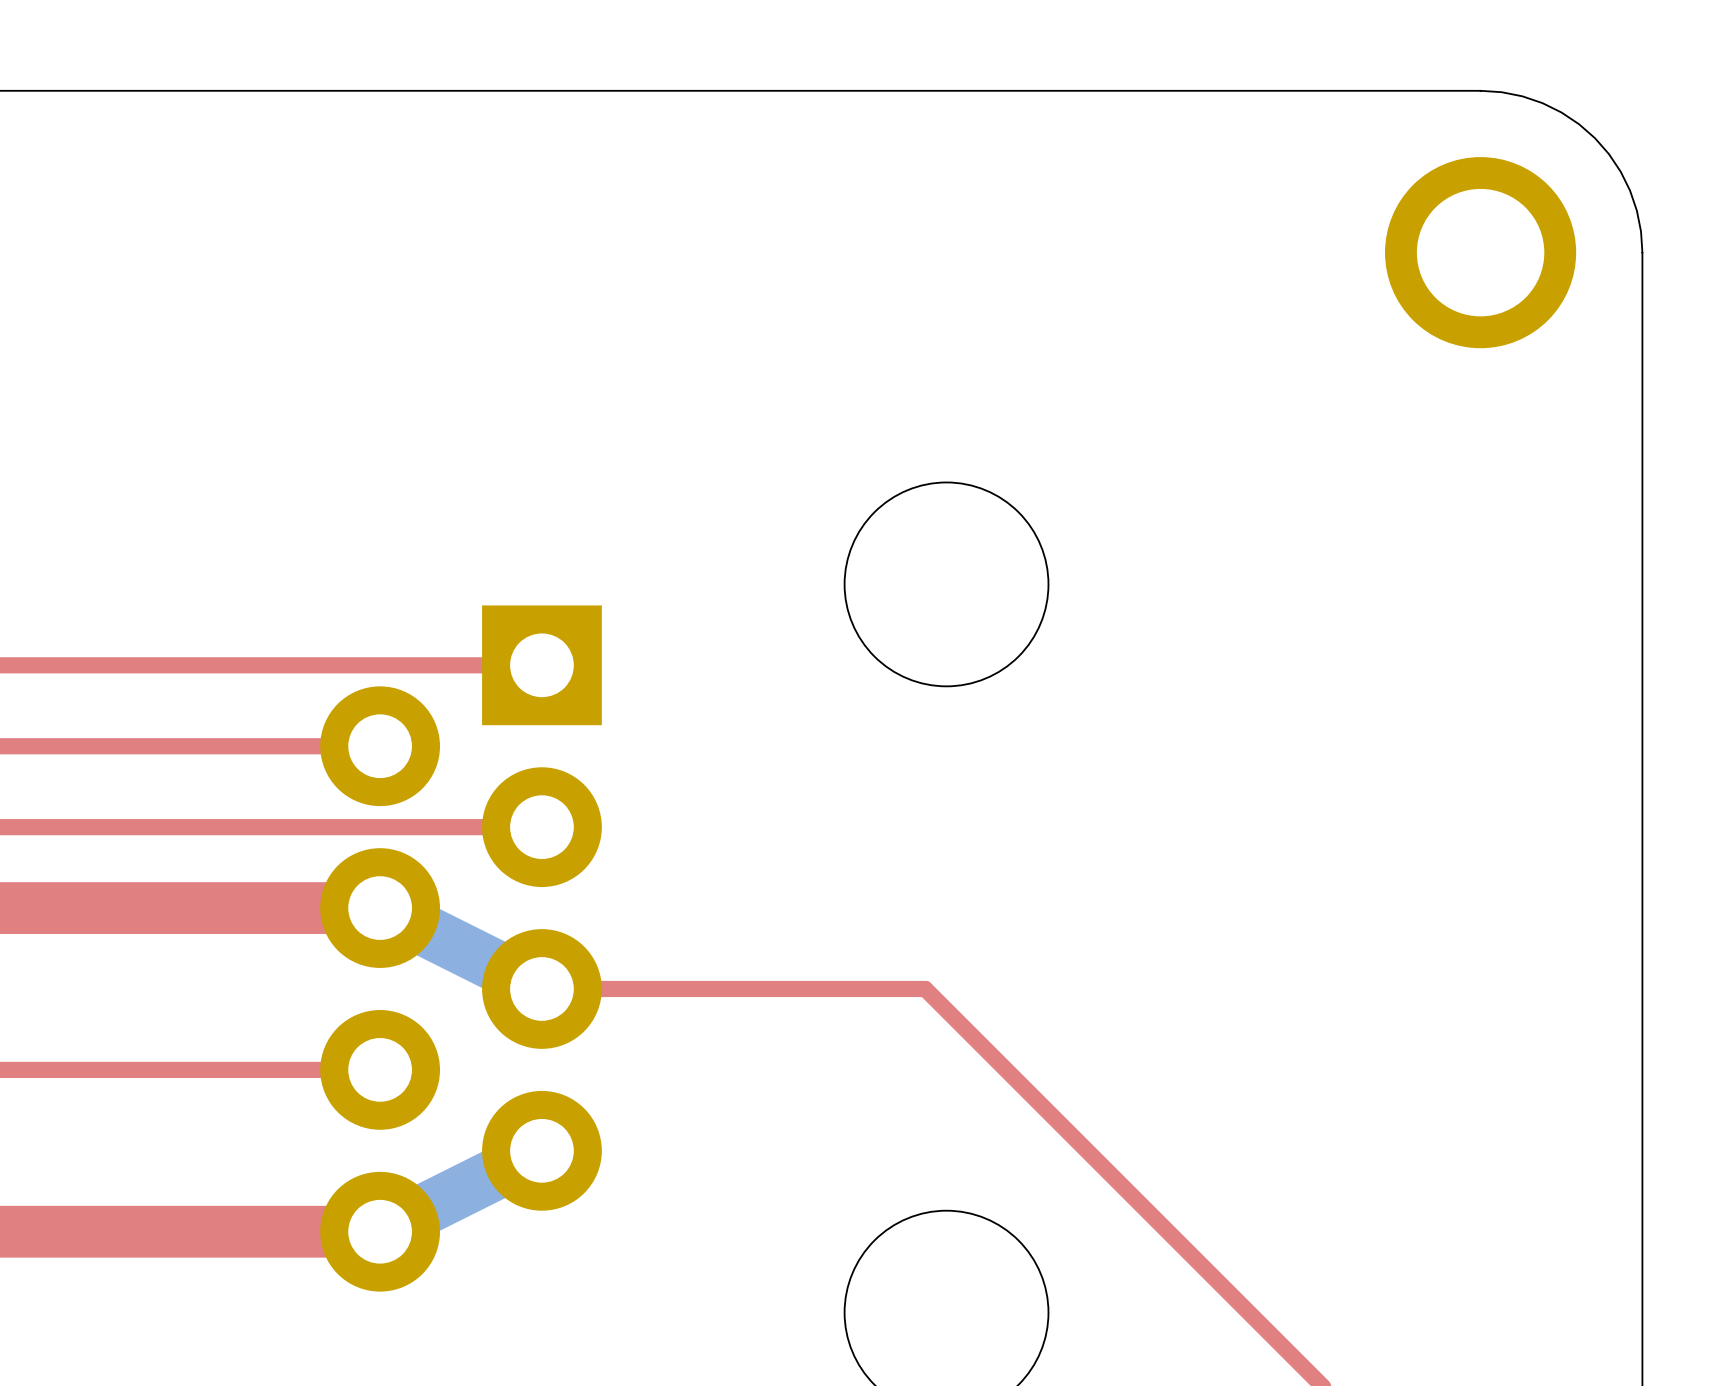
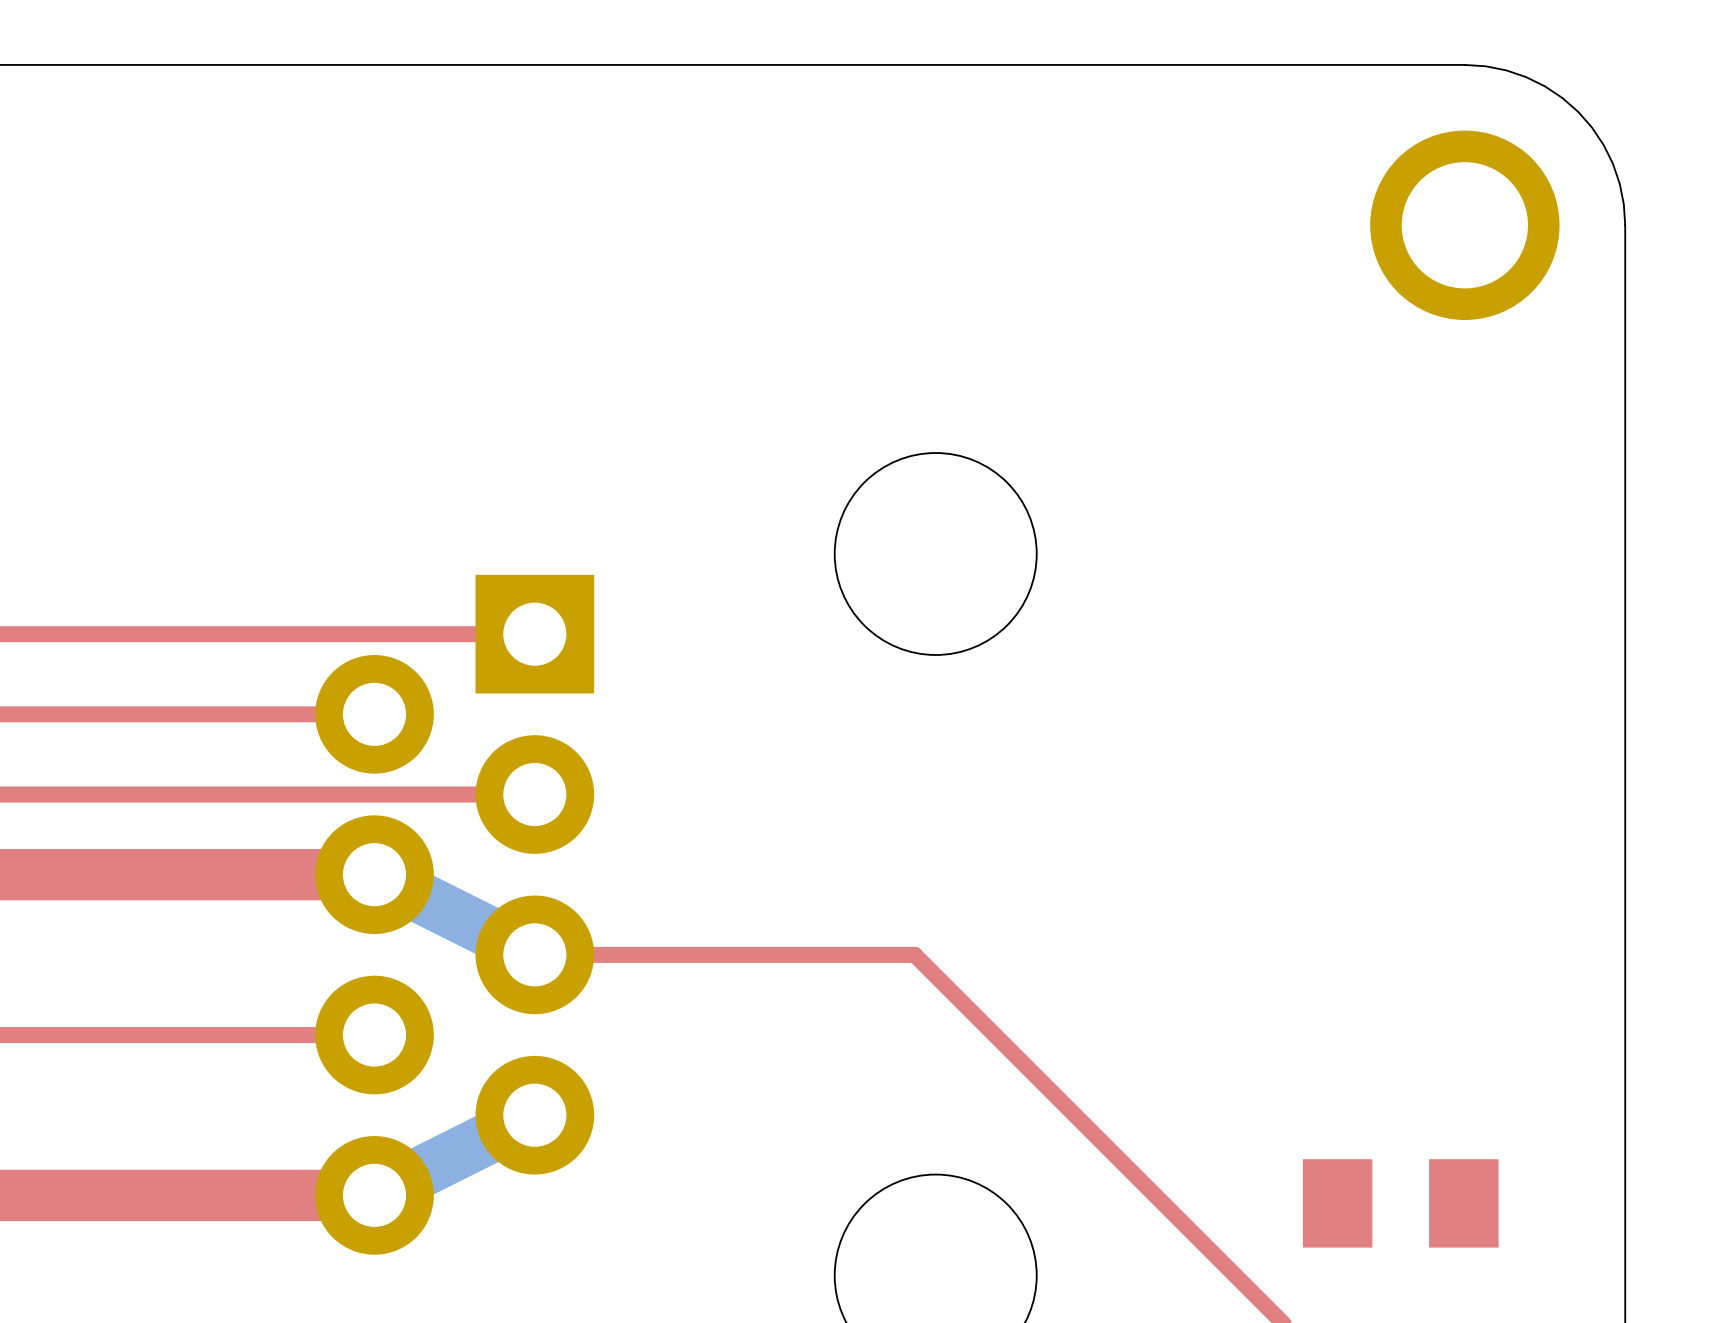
part: none -> (1400, 1203)

